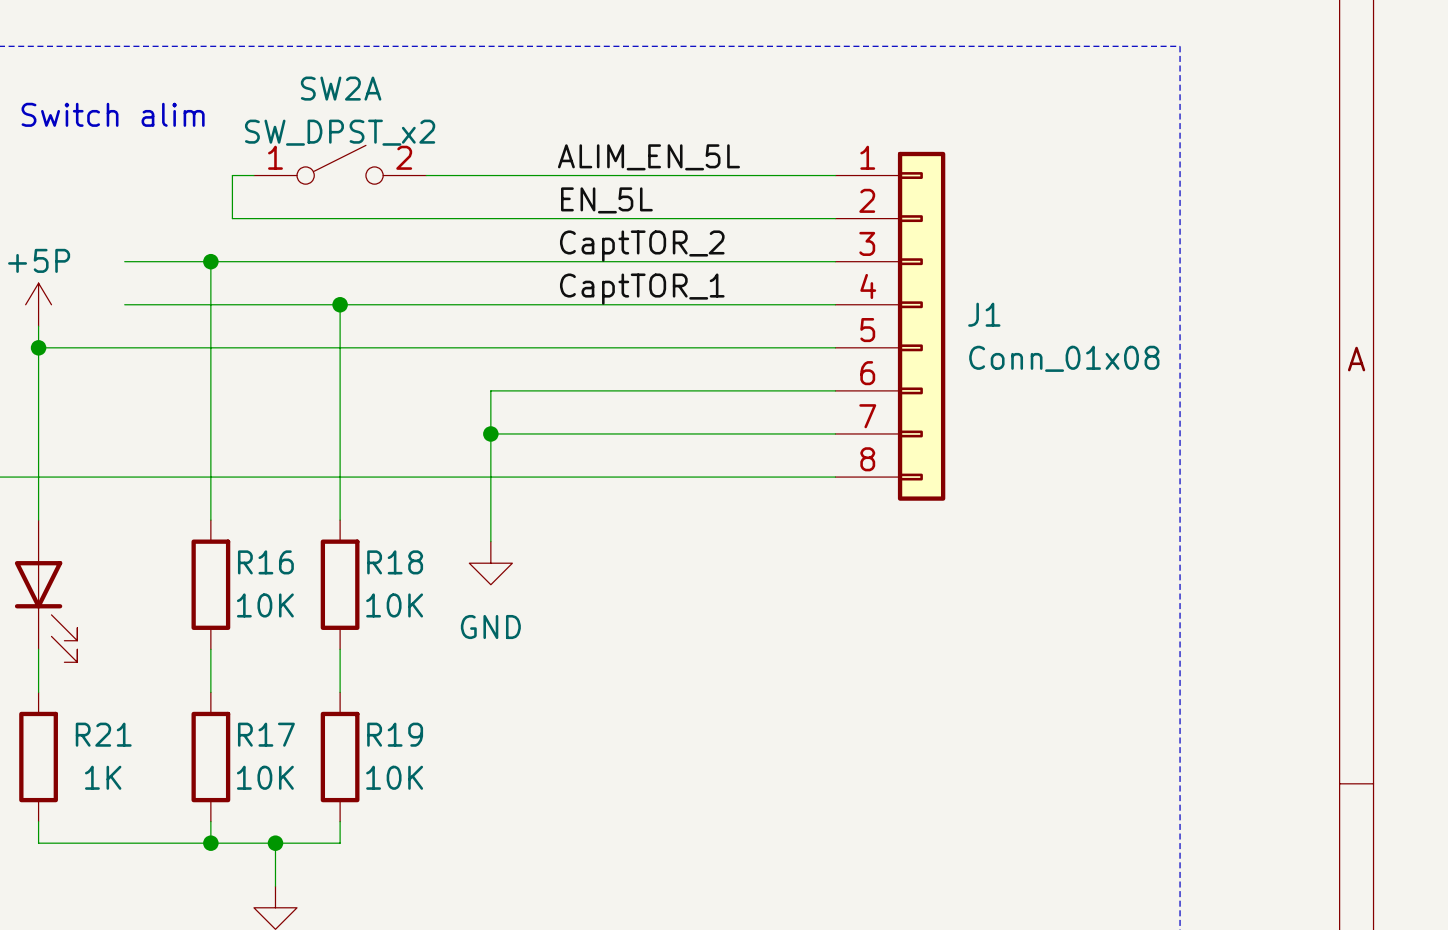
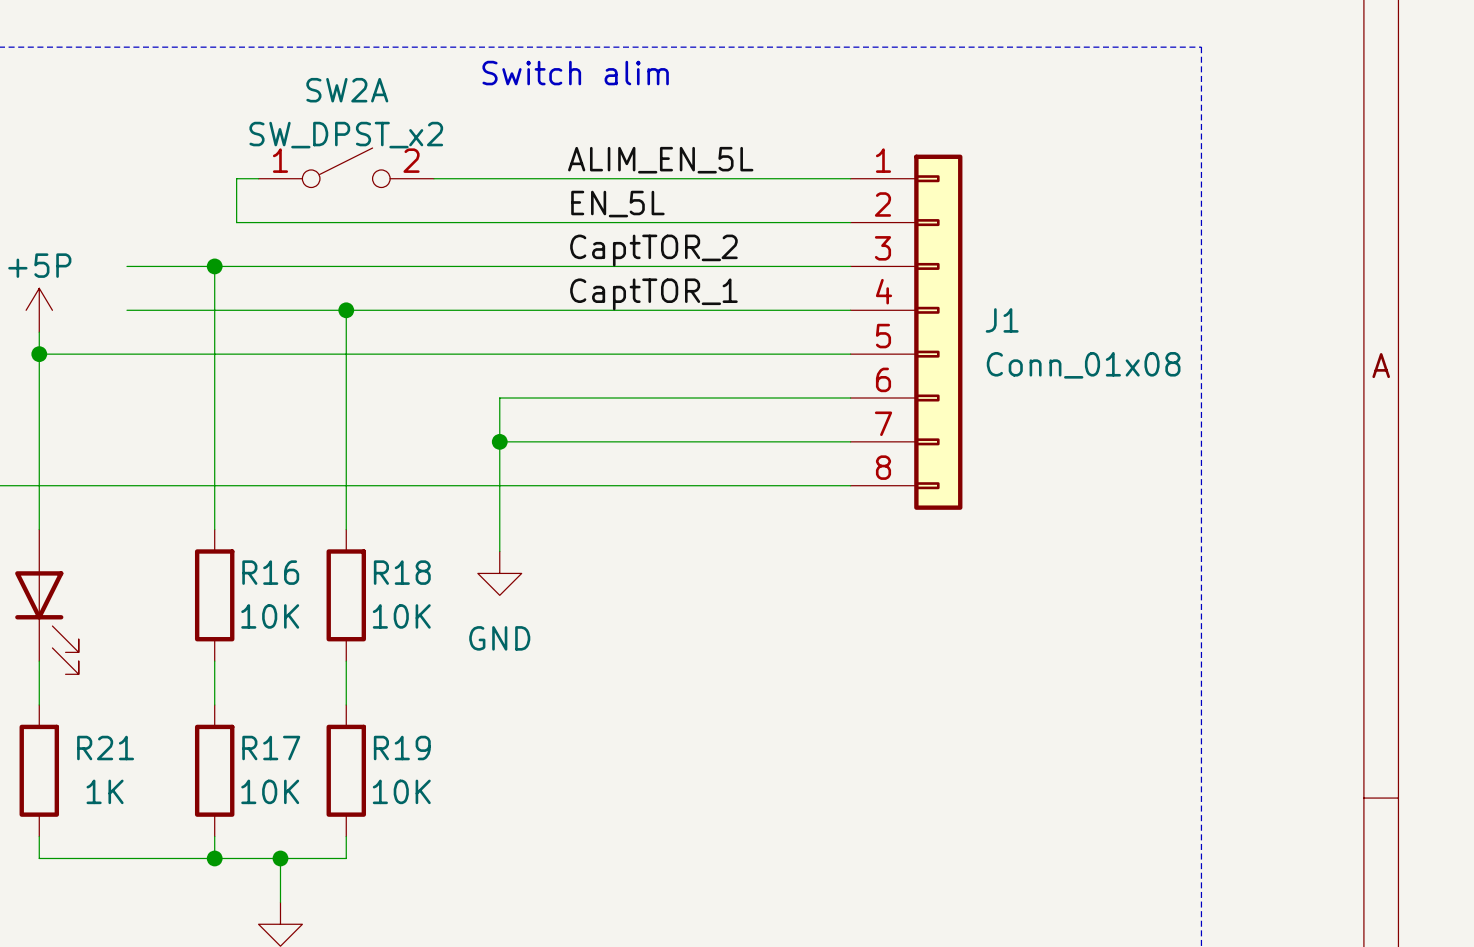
text: none -> Switch alim (575, 73)
text: Switch alim (113, 114) -> none

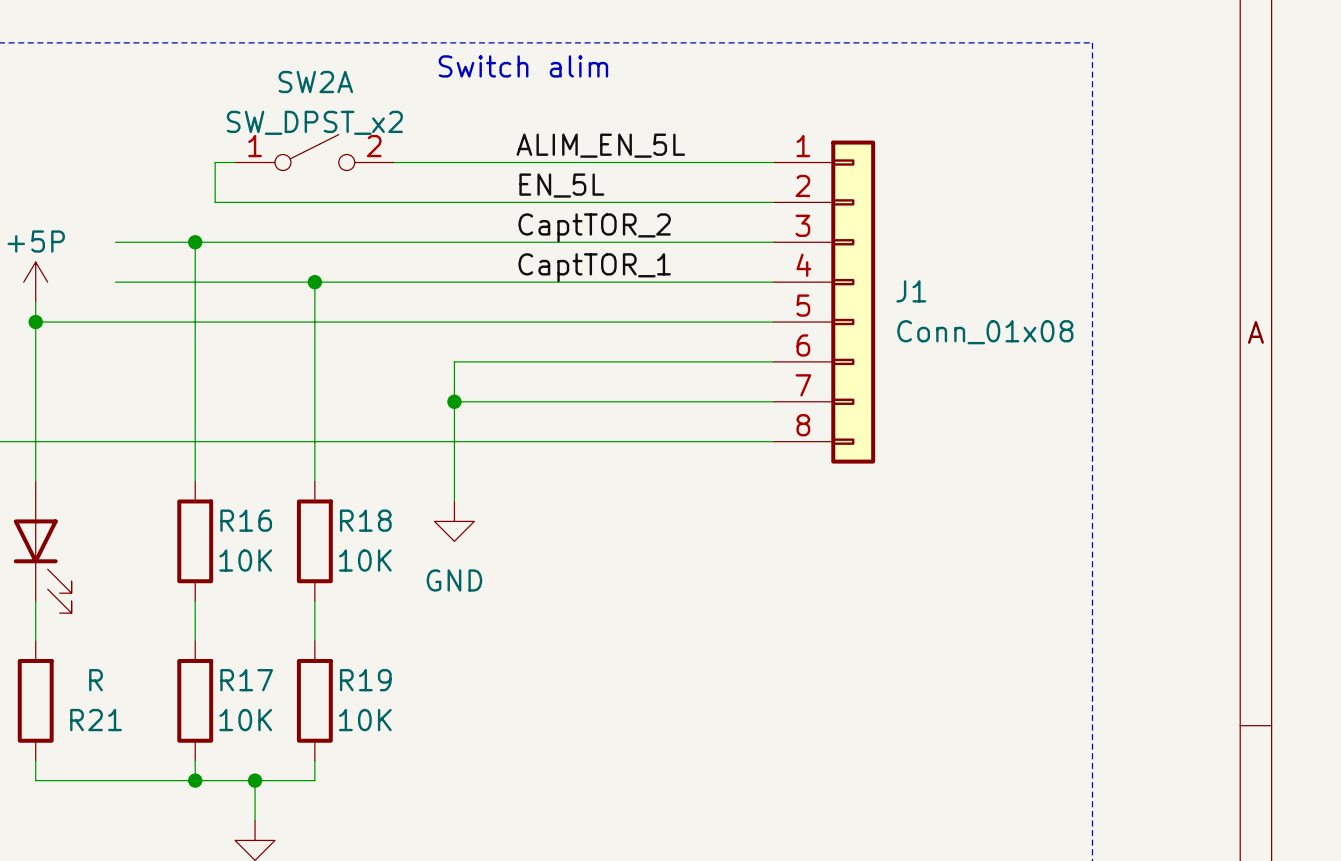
R21 name position: R21 (105, 748) -> R21 (96, 720)
R21 value: 1K (105, 791) -> R (96, 680)

